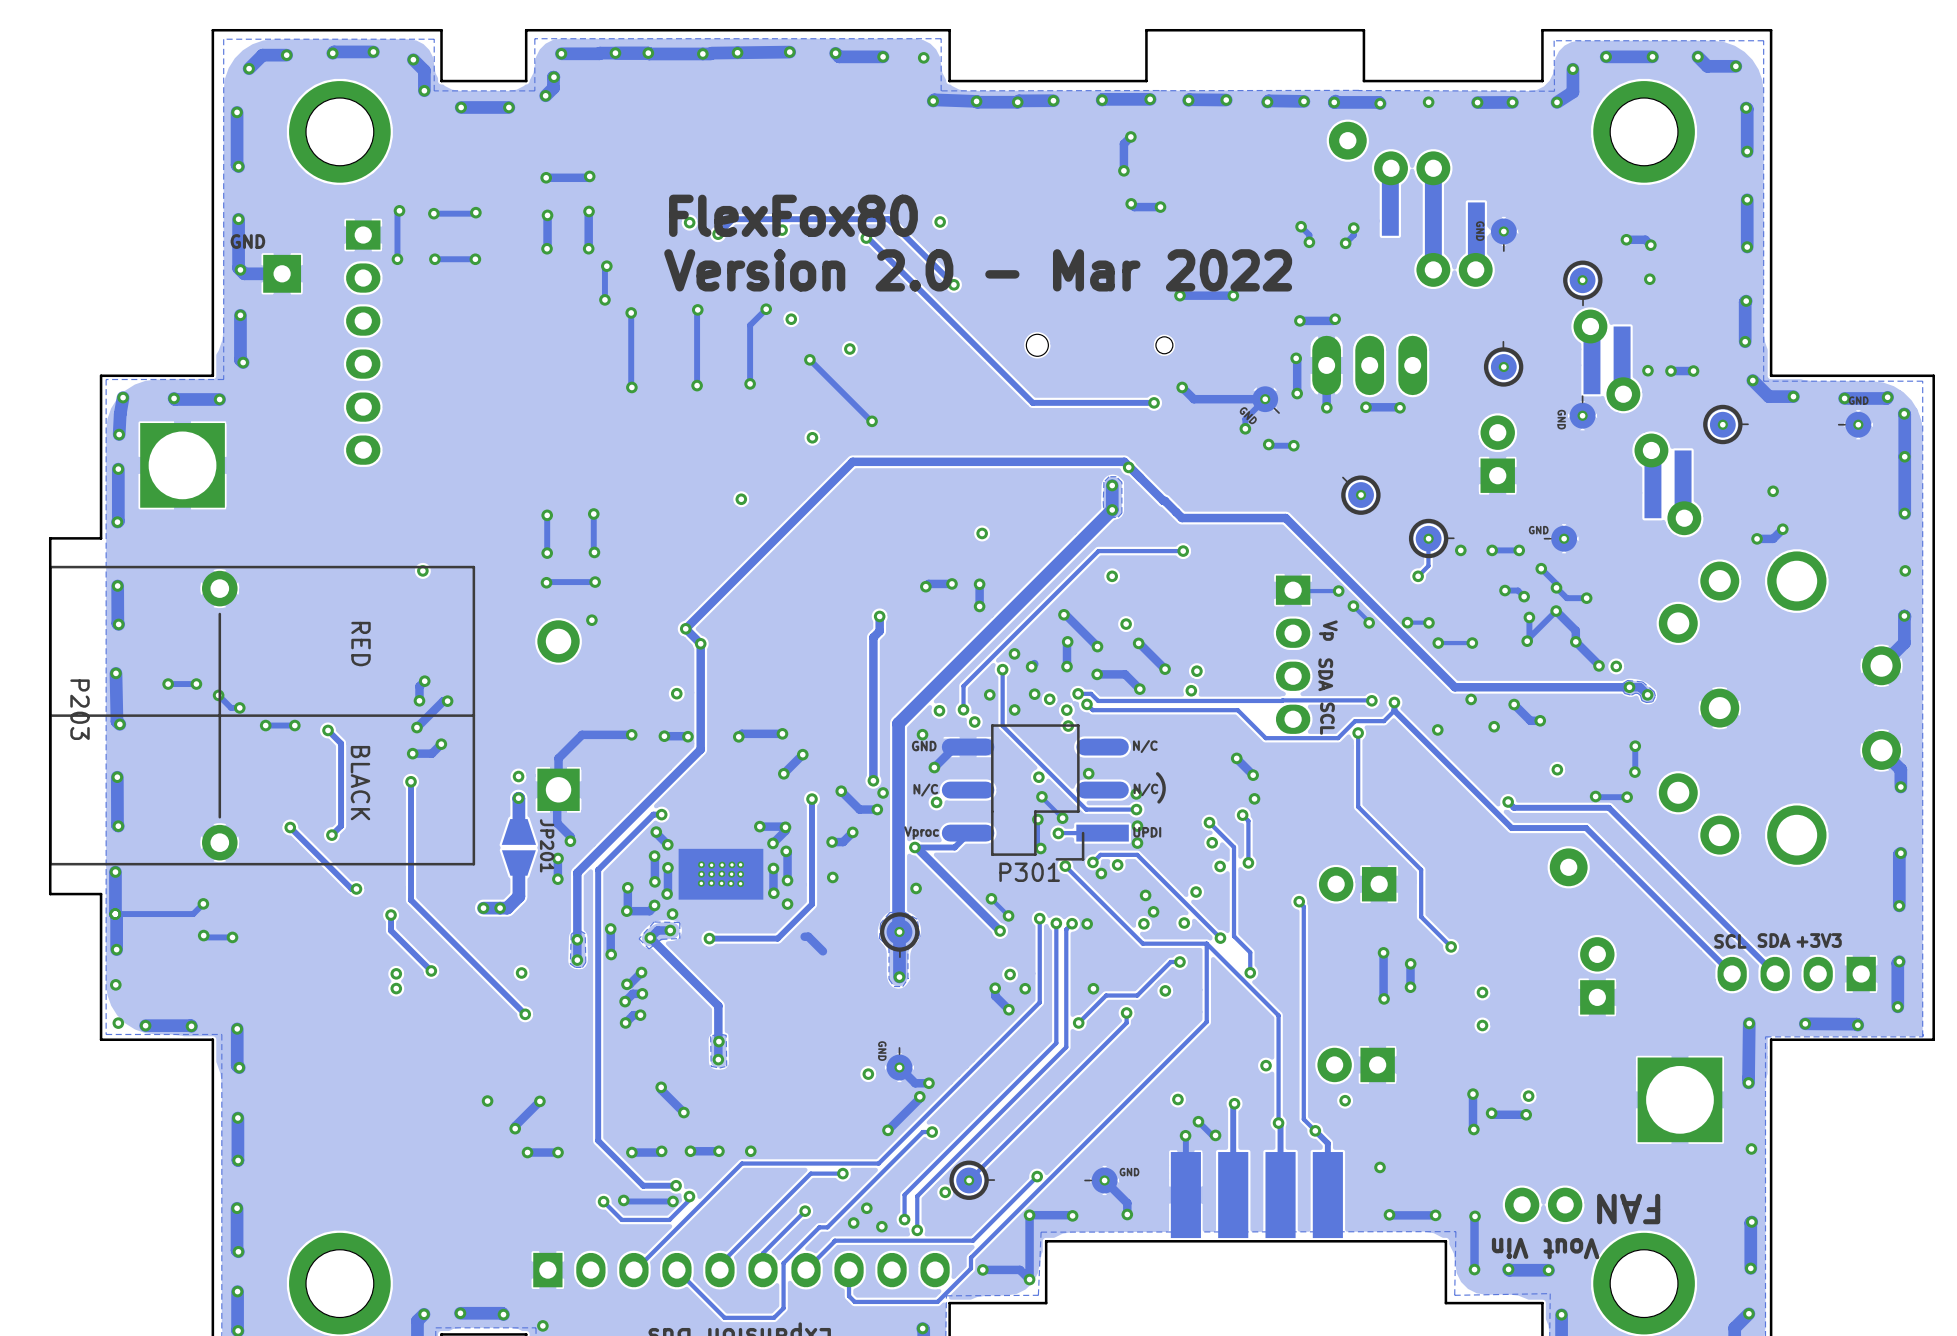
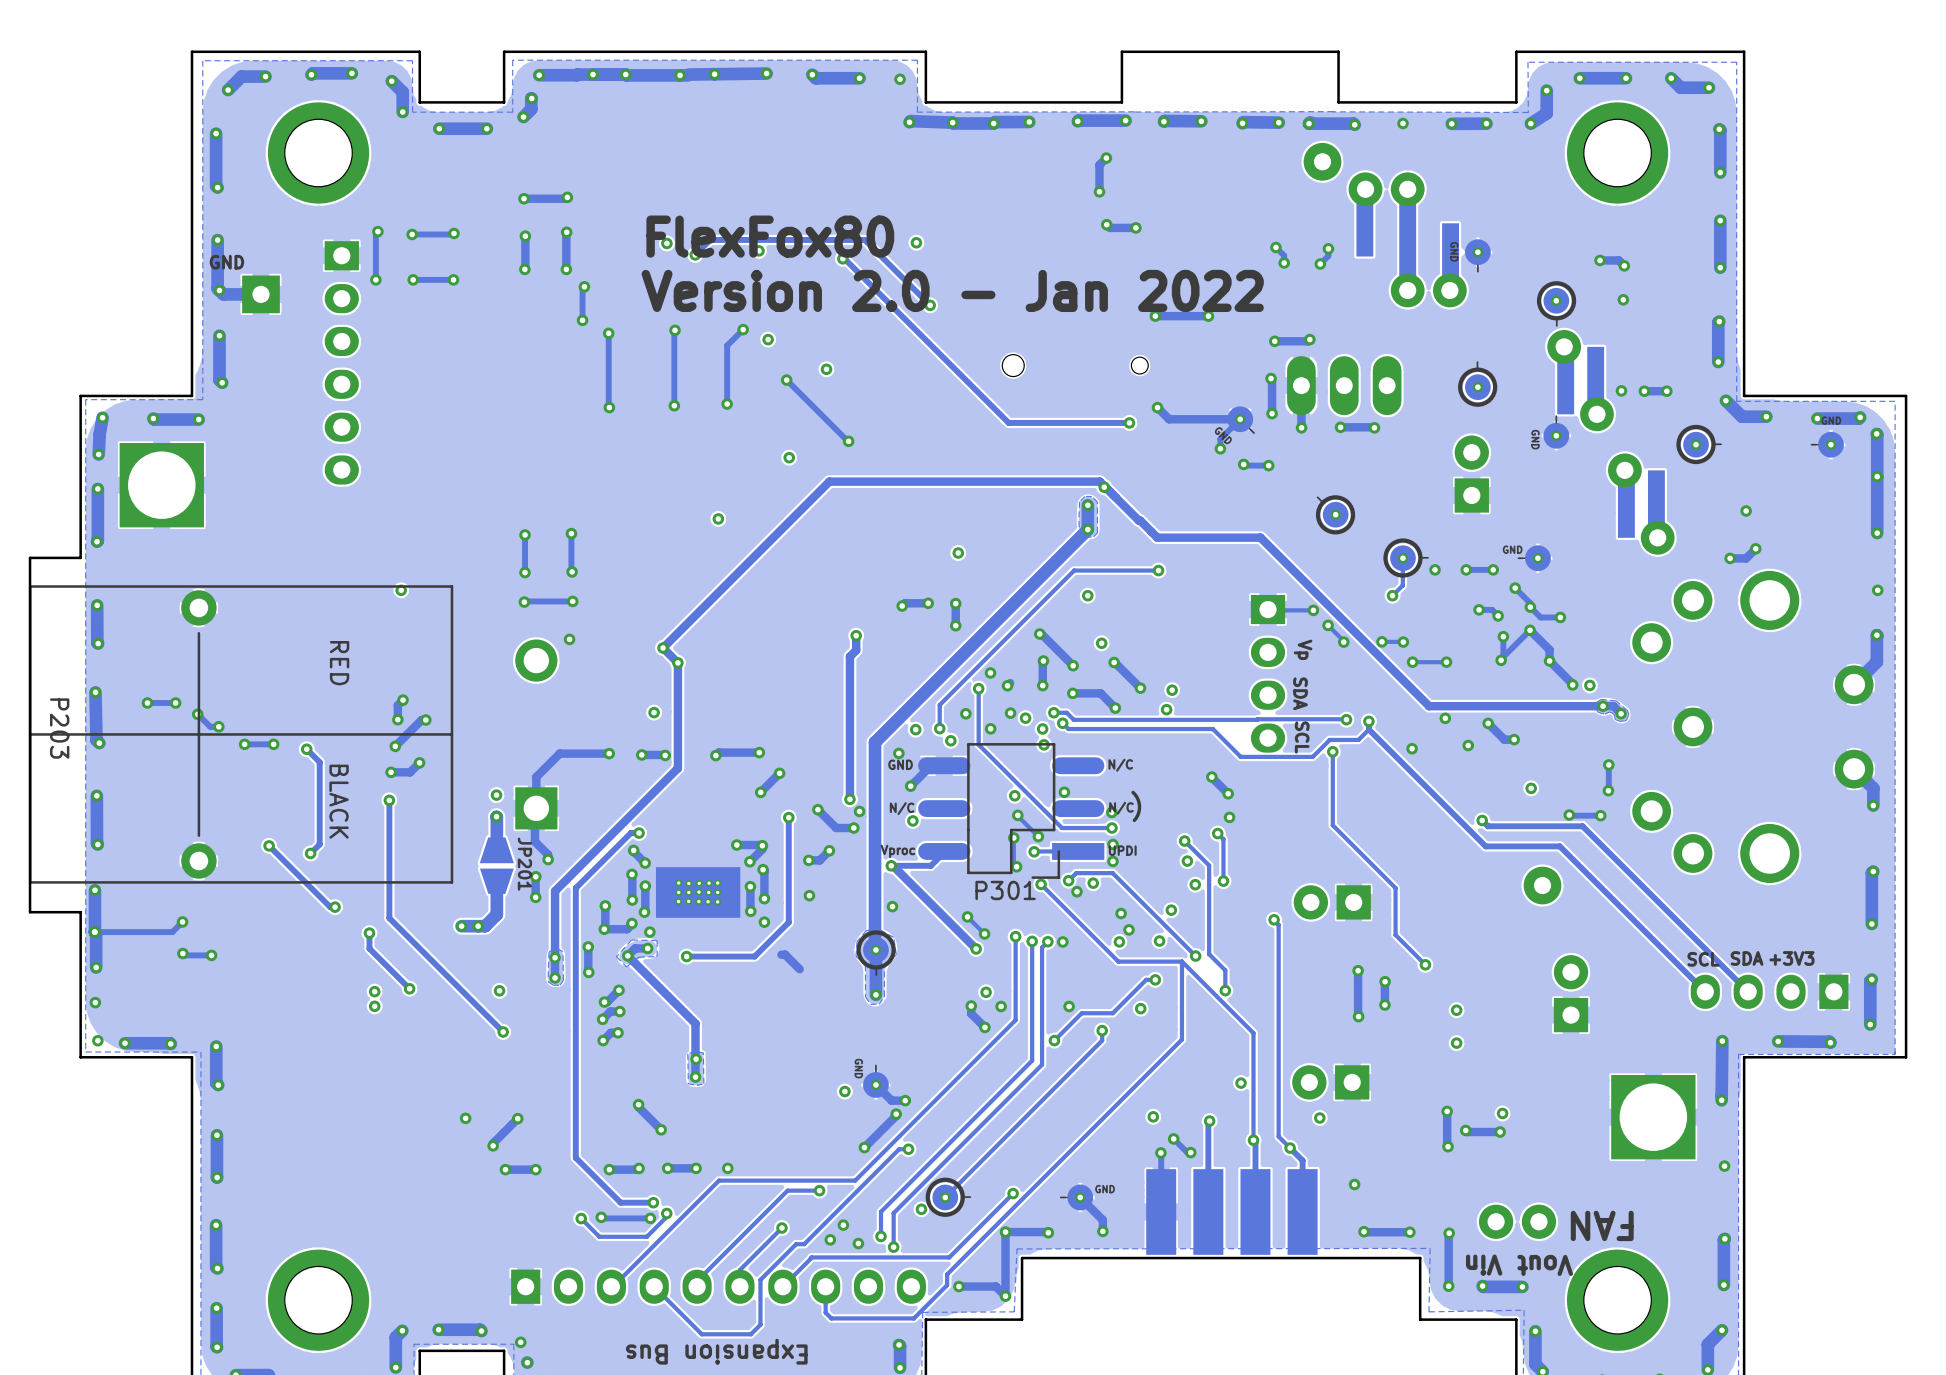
text: Version 2.0 - Mar 2022 (978, 270) -> Version 2.0 - Jan 2022 (952, 290)

